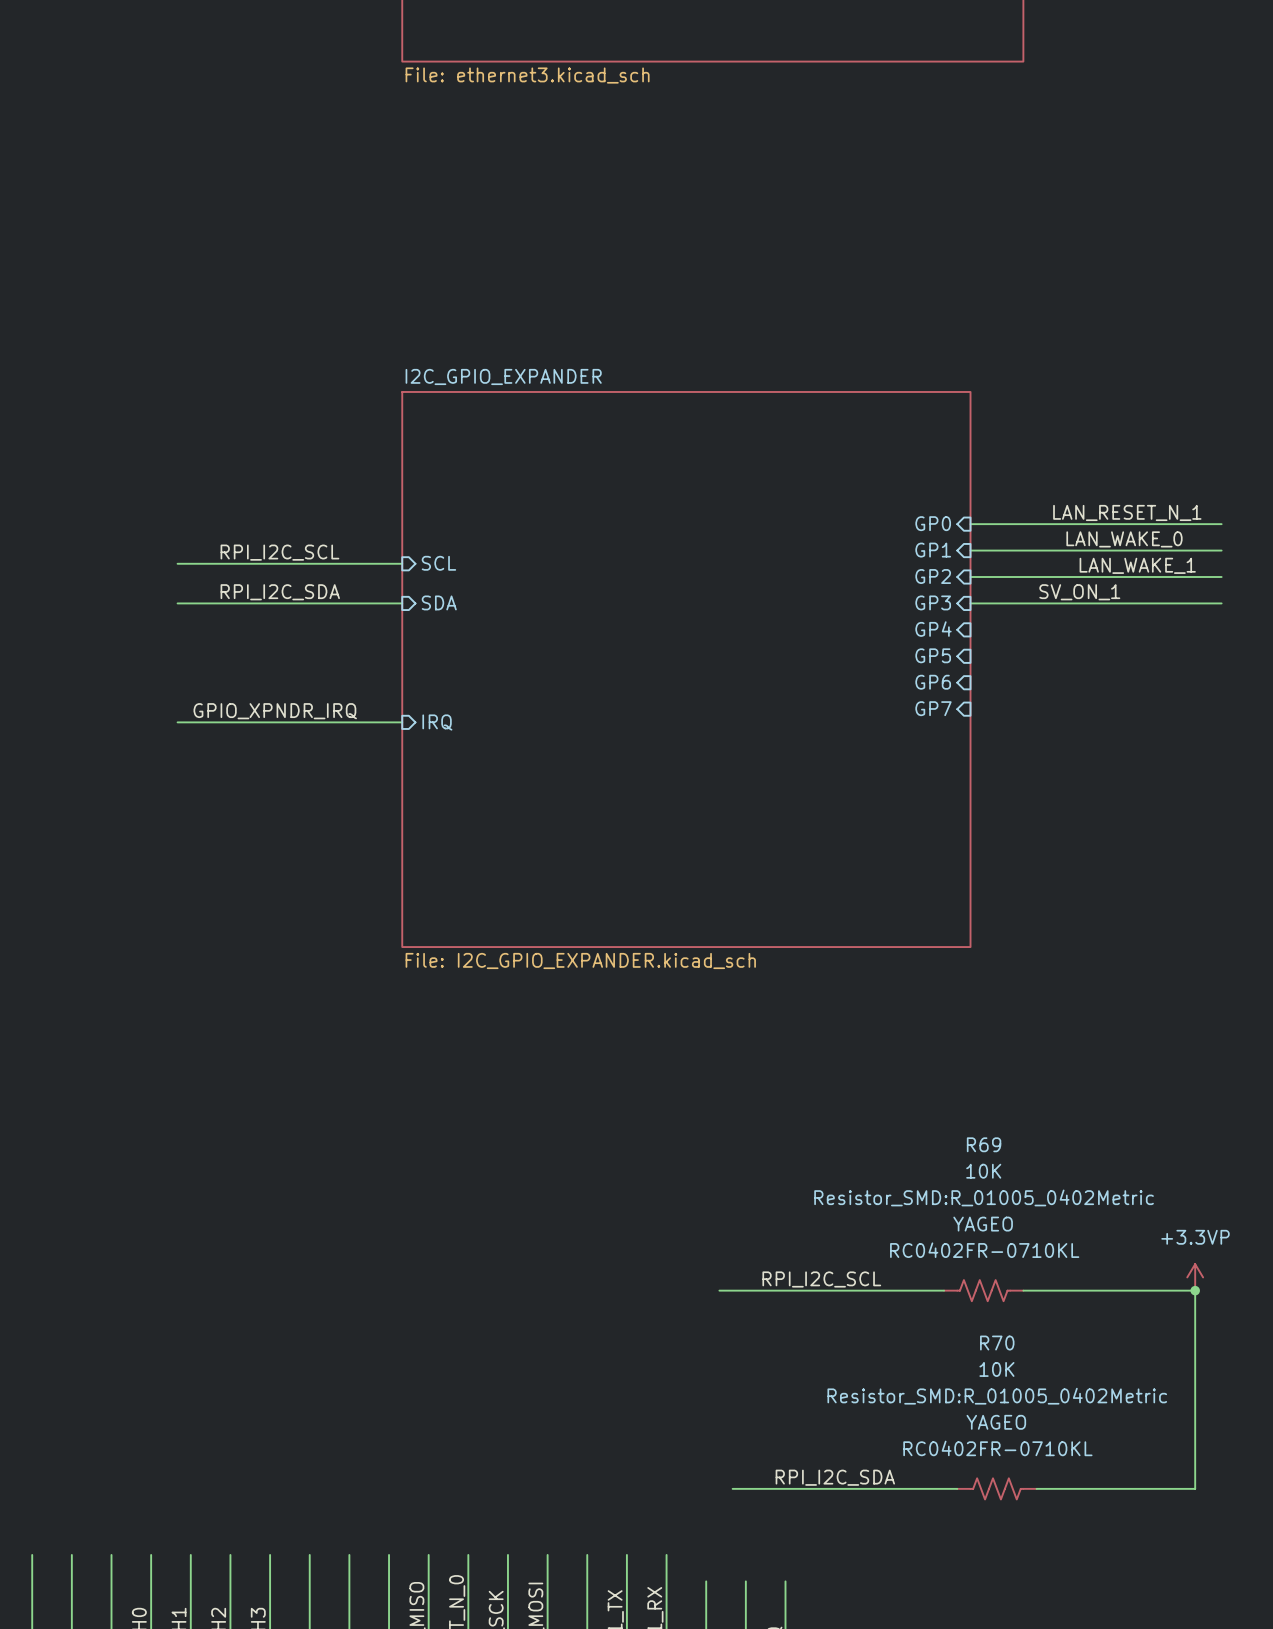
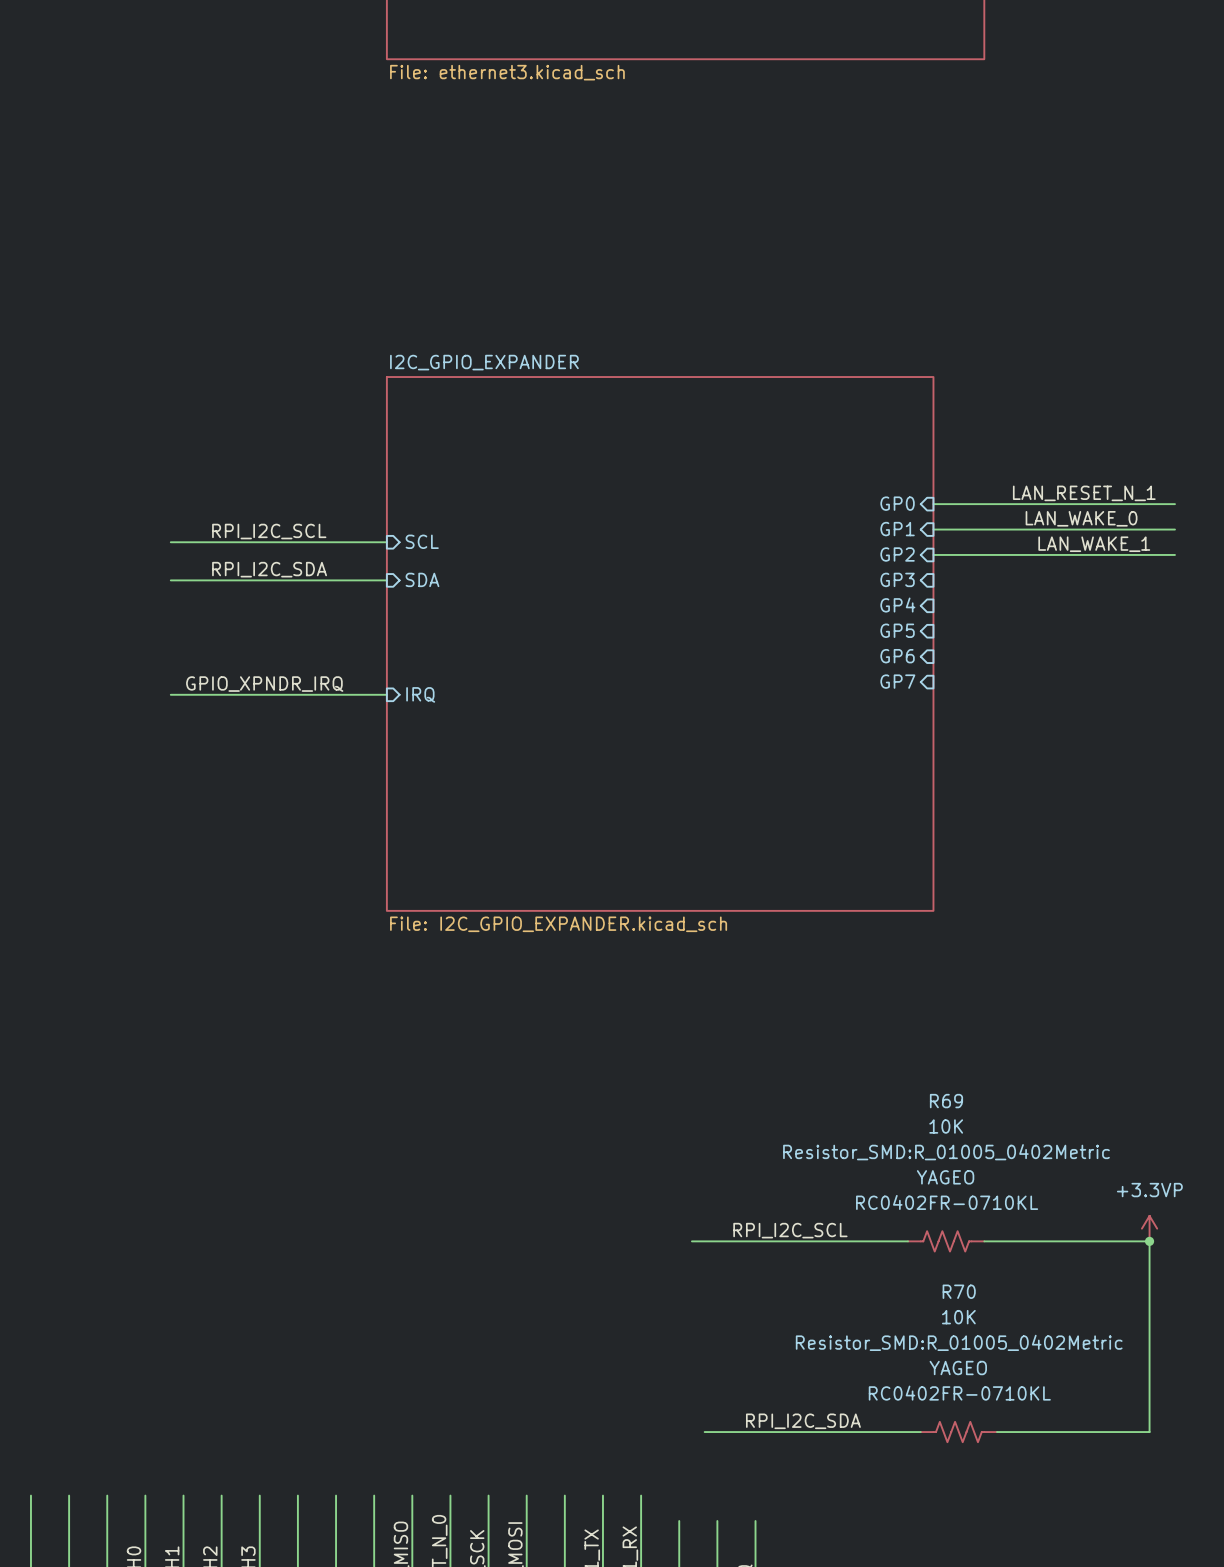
label: SV_ON_1 (1079, 592) -> none
wire: (970, 603) (1221, 603) -> none

